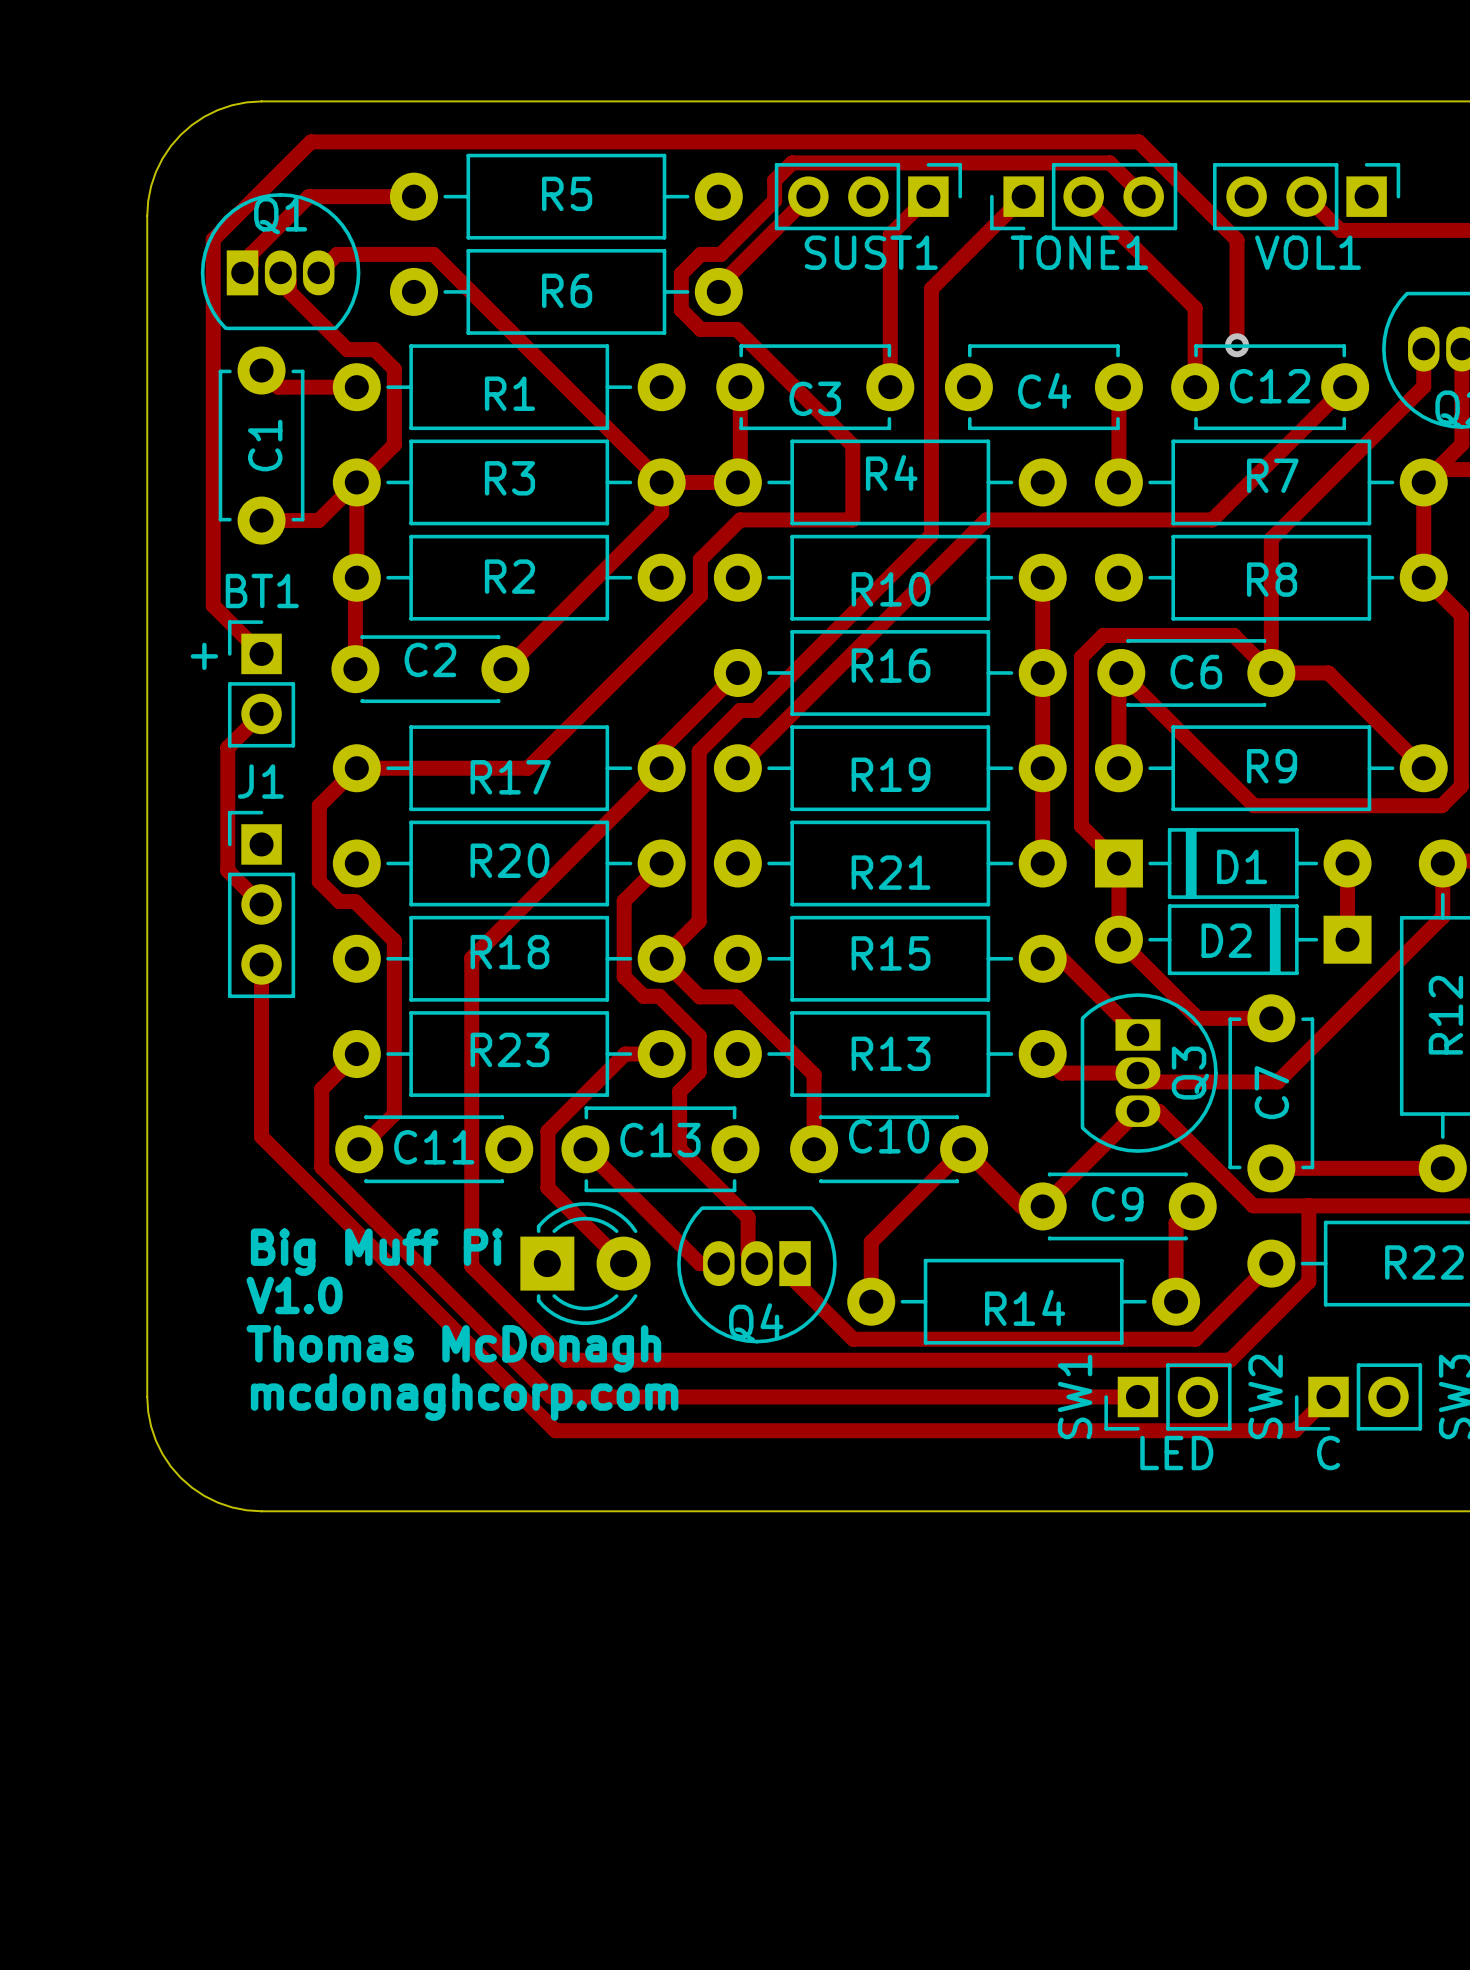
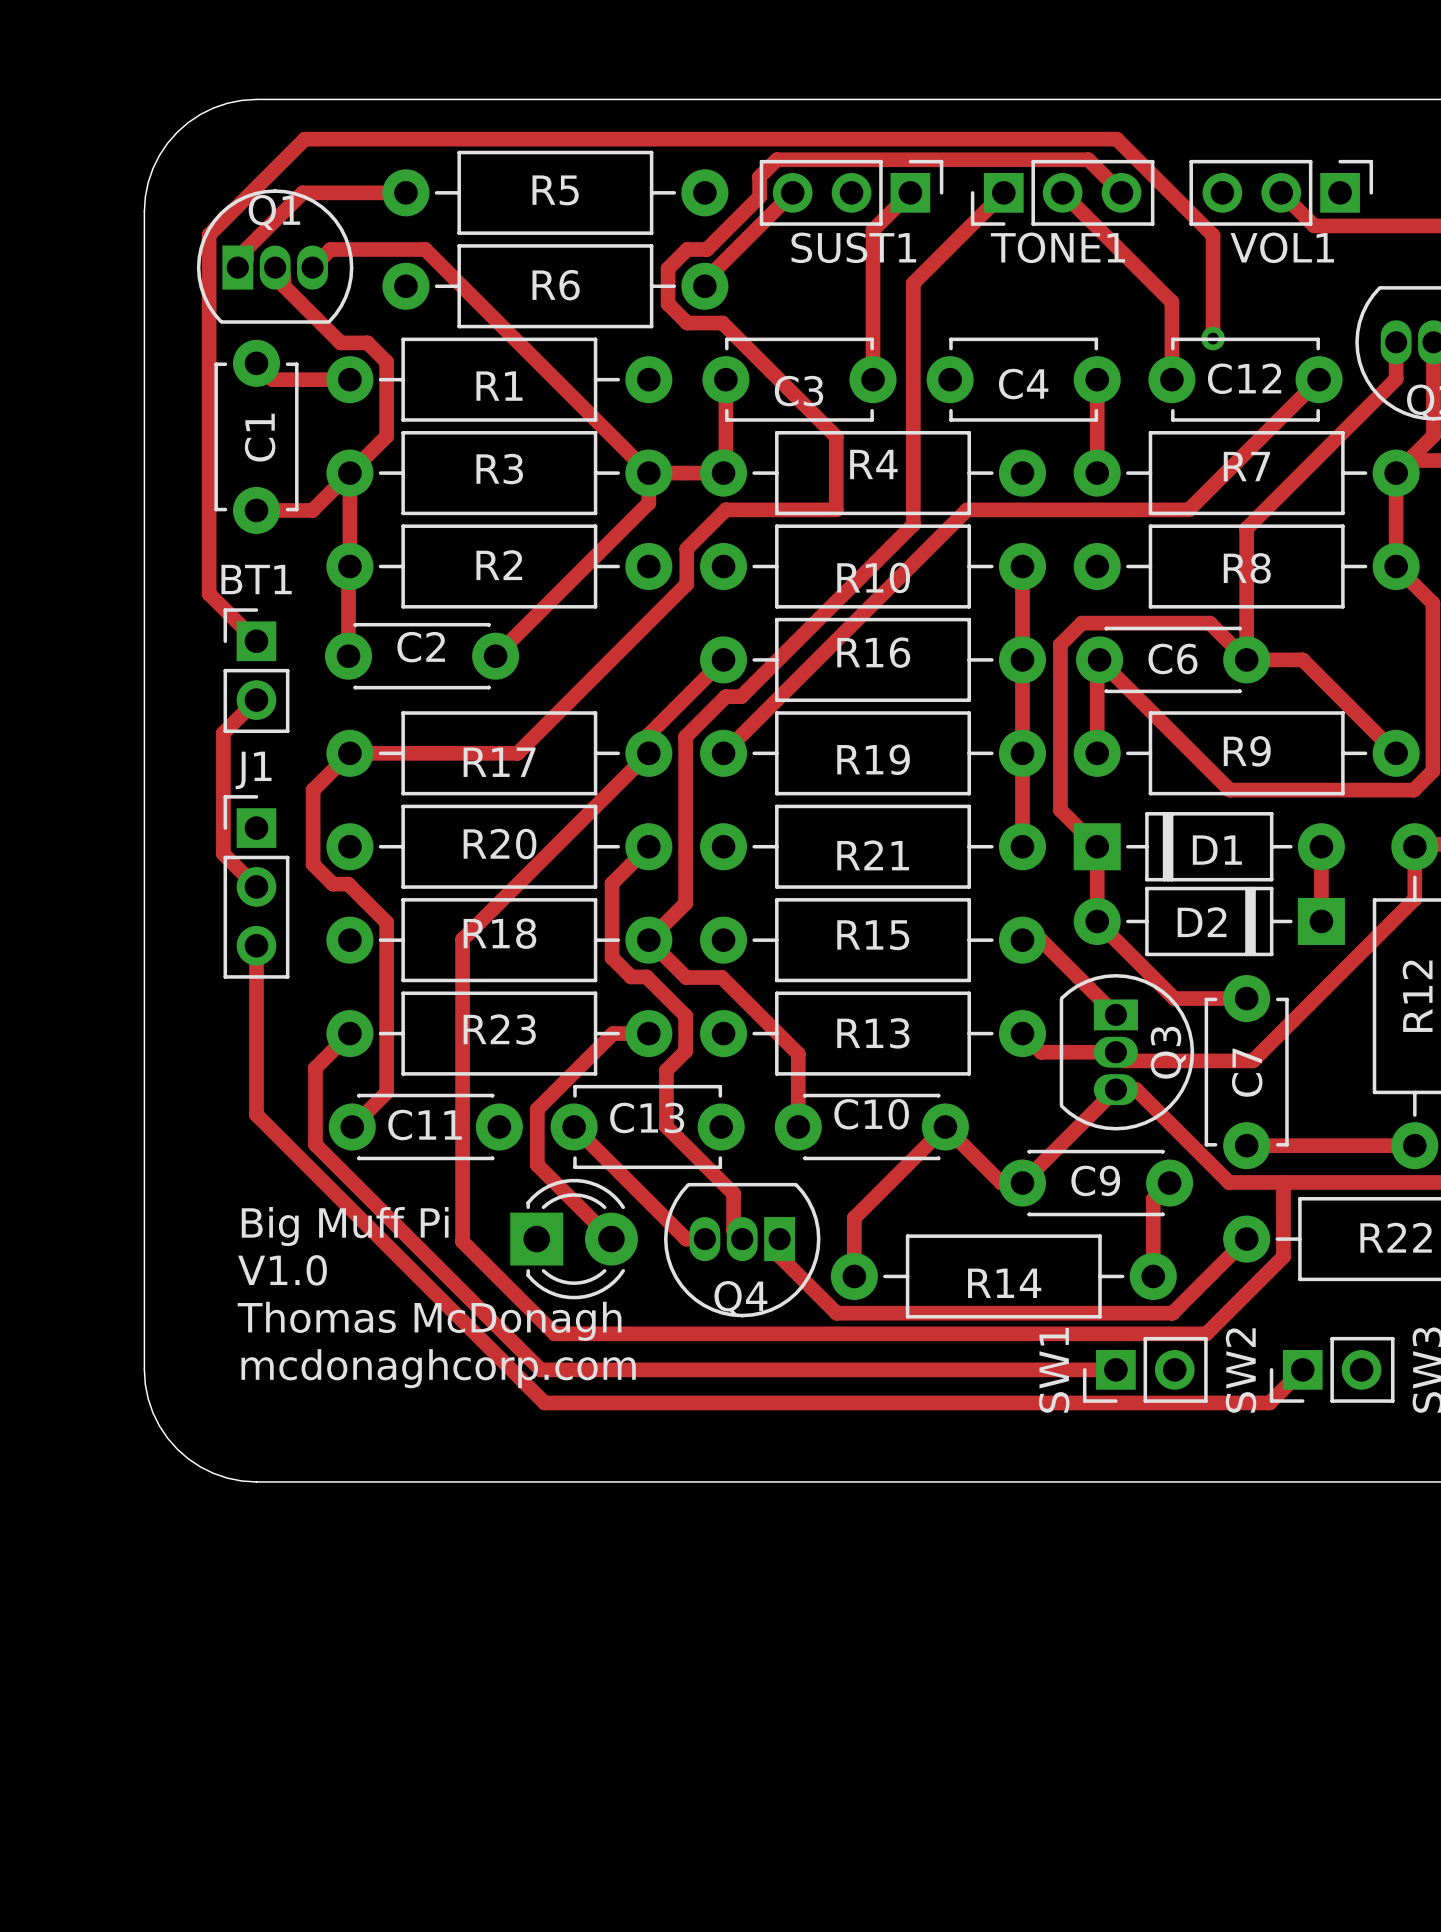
text: + (204, 656) -> none
text: LED (1176, 1453) -> none
text: C (1328, 1453) -> none

